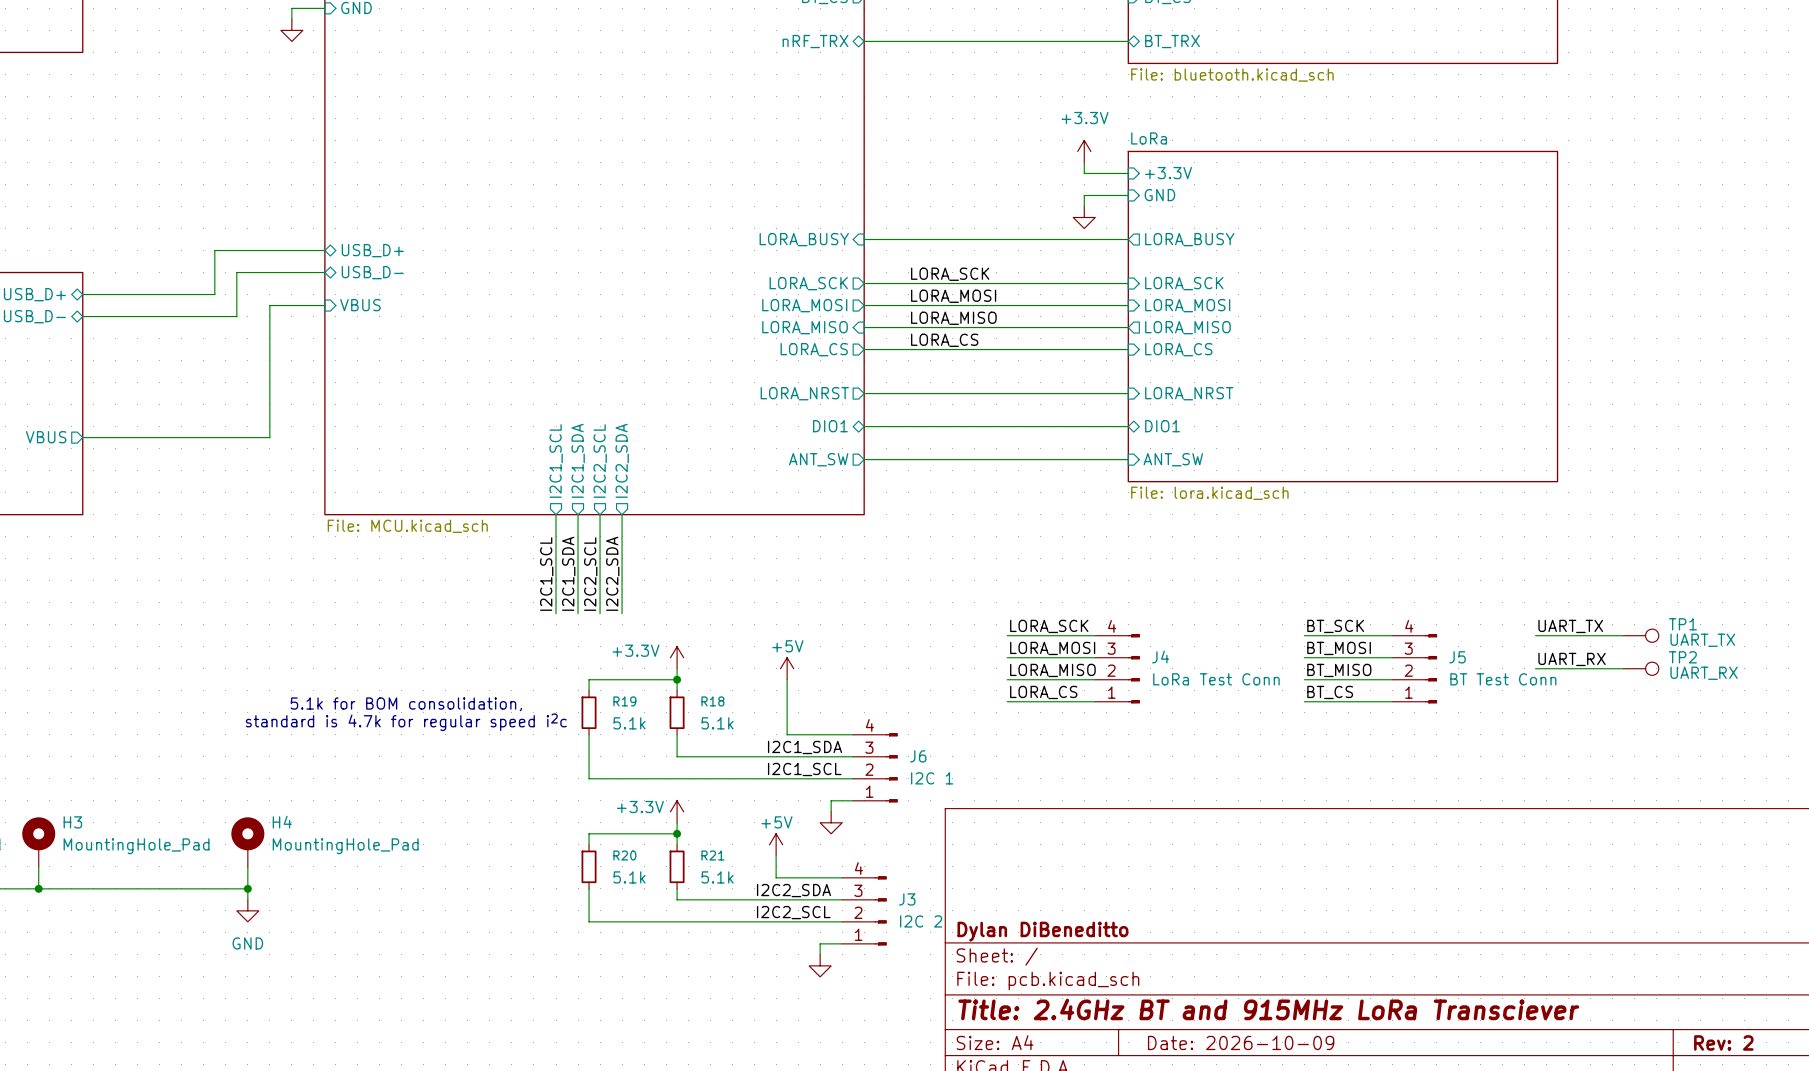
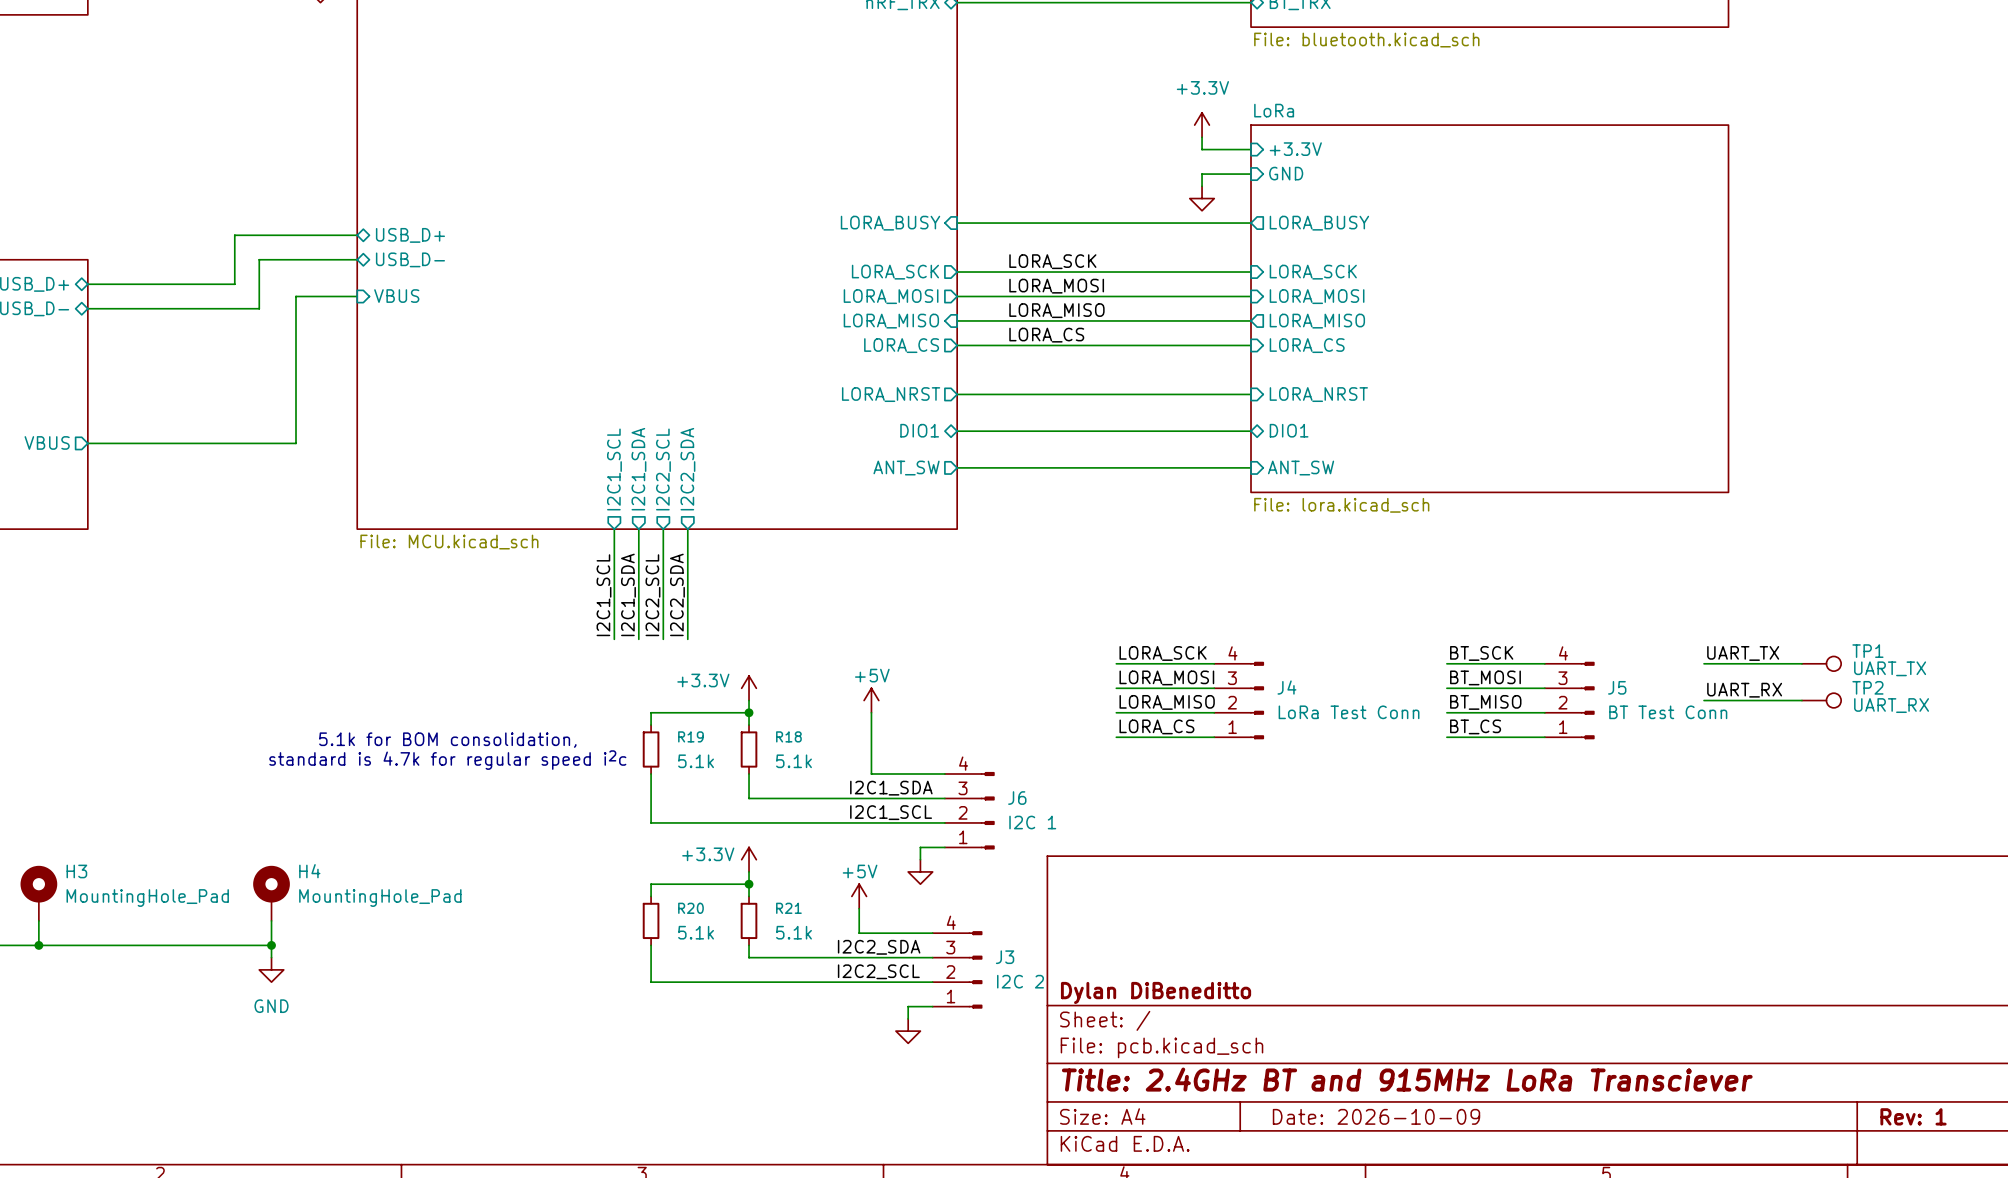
title block: Rev: 2 (1723, 1042) -> Rev: 1 (1913, 1116)

